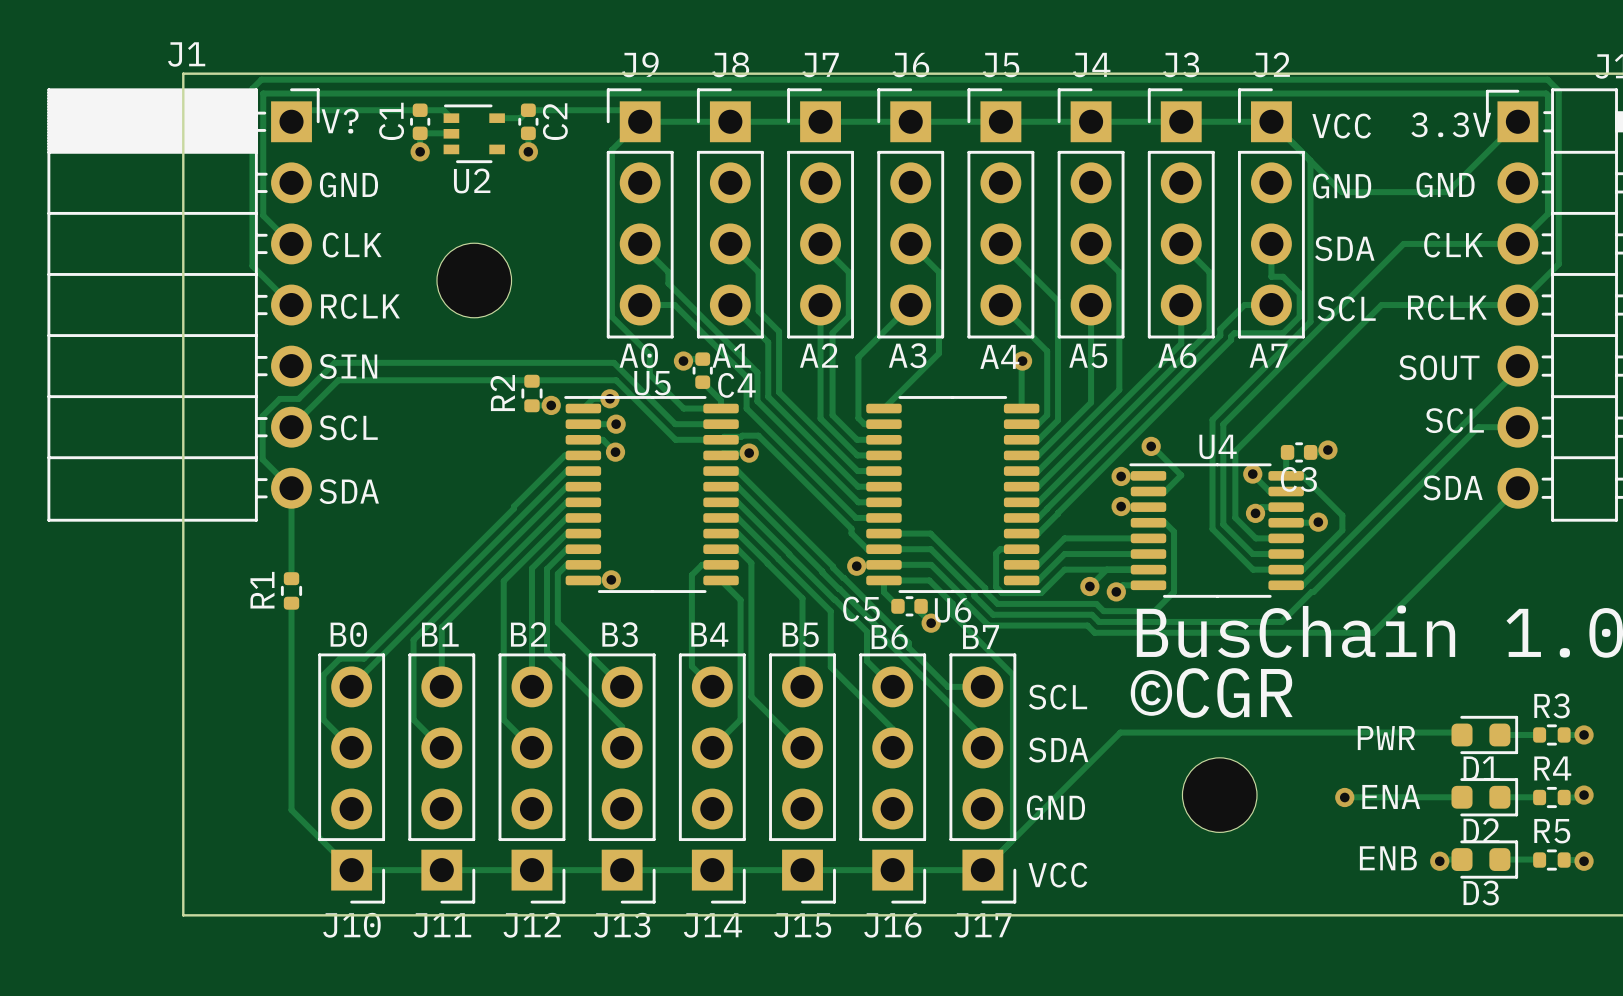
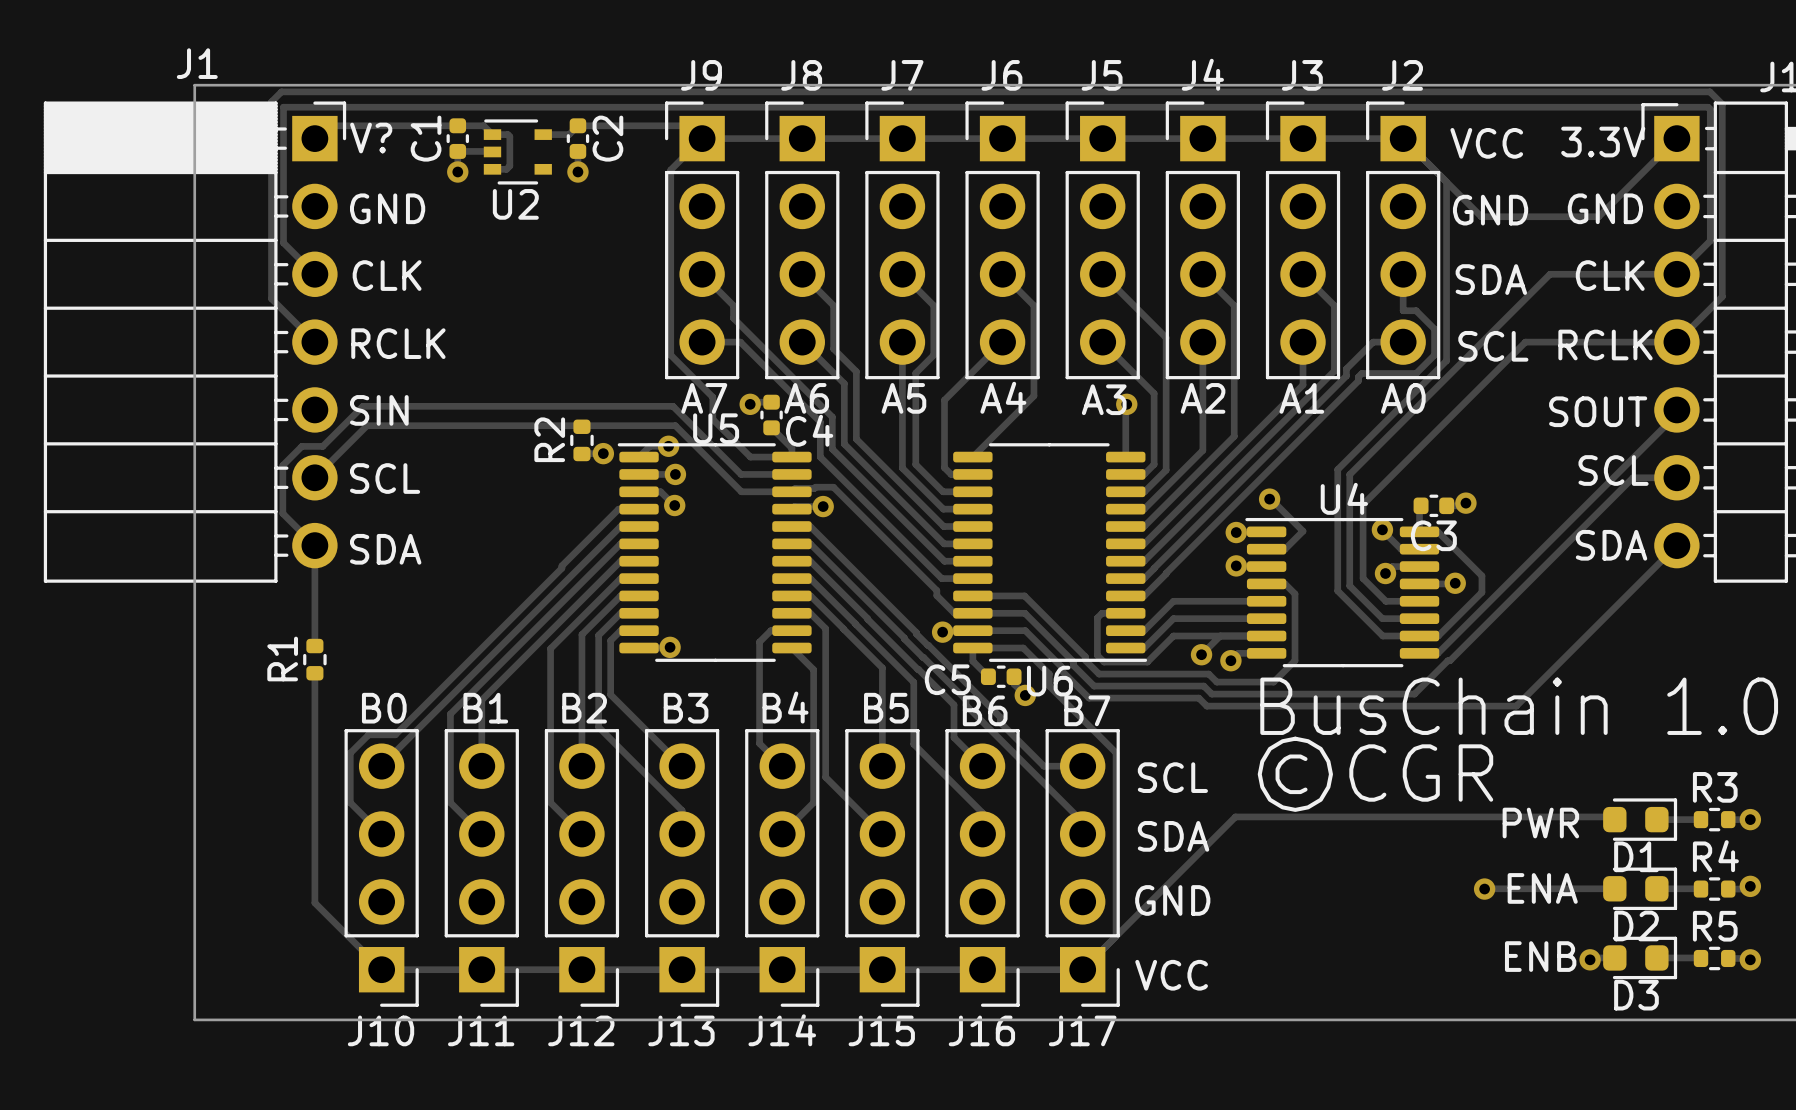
track: none -> (492, 134) (507, 134) (509, 136) (509, 165) (506, 169) (492, 169)
part: (474, 280) -> none
text: A0 (638, 355) -> A7 (704, 398)
text: A1 (731, 355) -> A6 (806, 398)
text: A2 (819, 355) -> A5 (903, 398)
text: A3 (907, 355) -> A4 (1003, 397)
text: A5 (1088, 355) -> A2 (1203, 398)
text: A6 (1177, 355) -> A1 (1301, 398)
text: A7 (1268, 355) -> A0 (1403, 398)
text: A4 (999, 356) -> A3 (1104, 399)
part: (1219, 795) -> none

